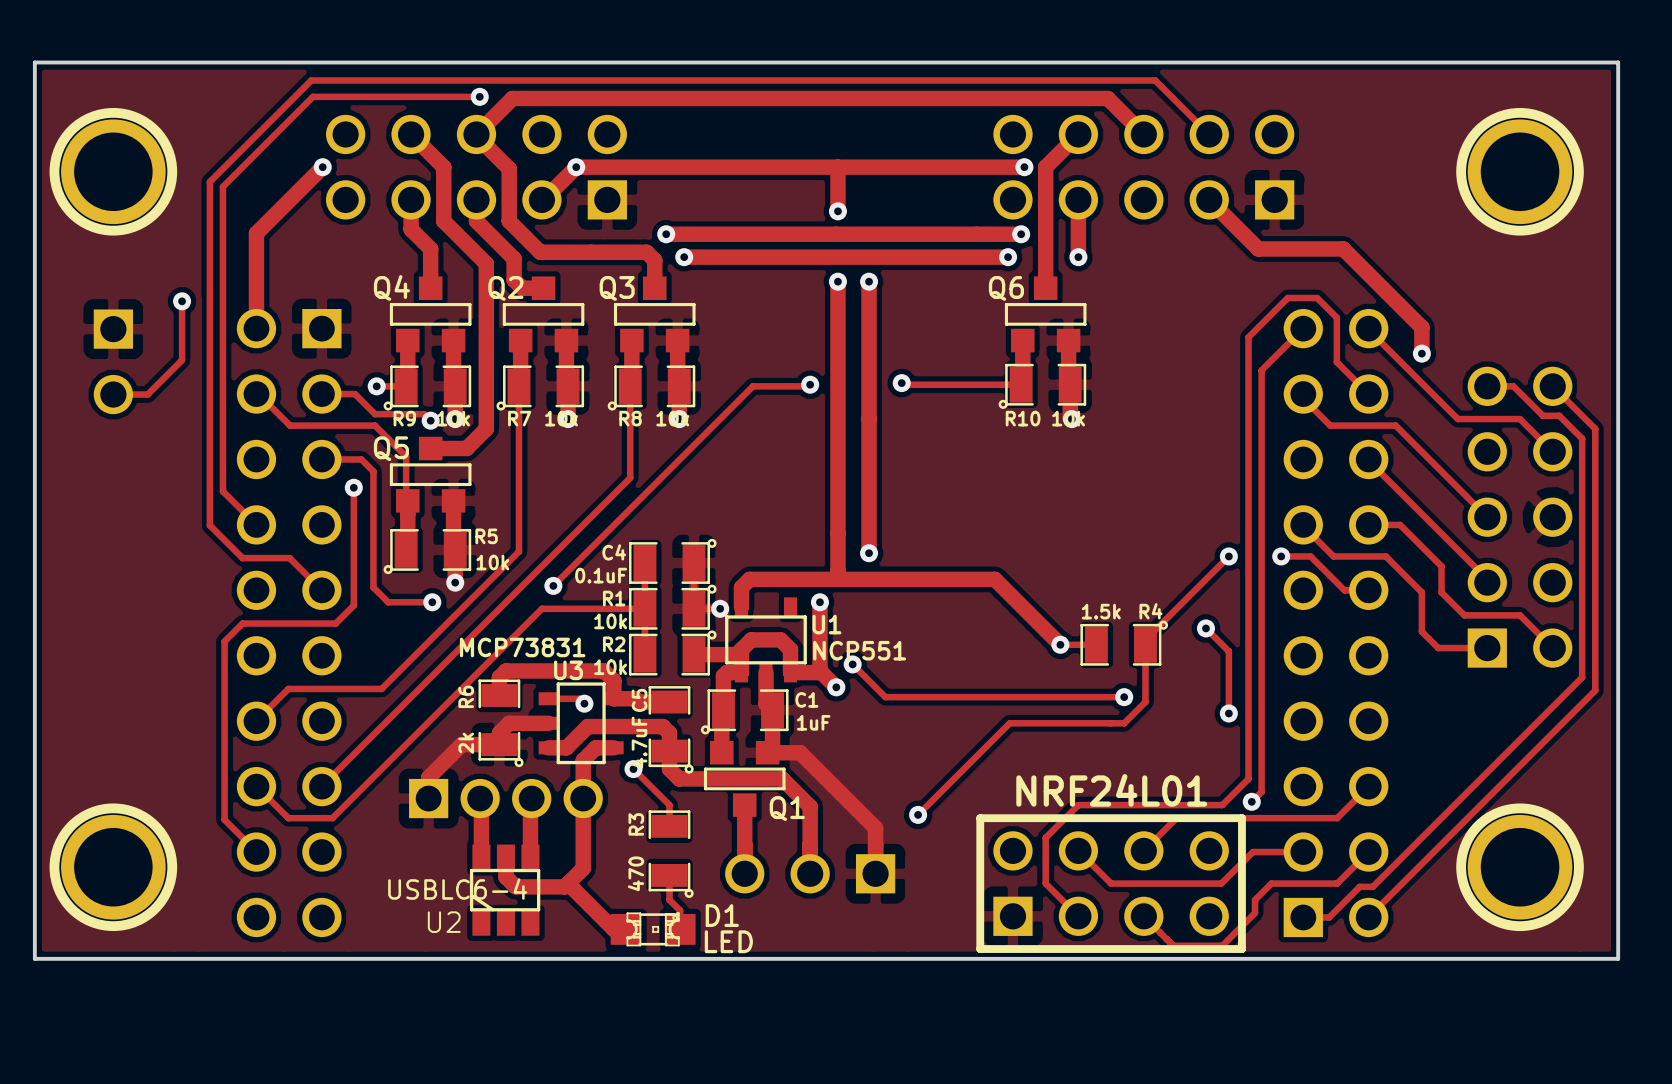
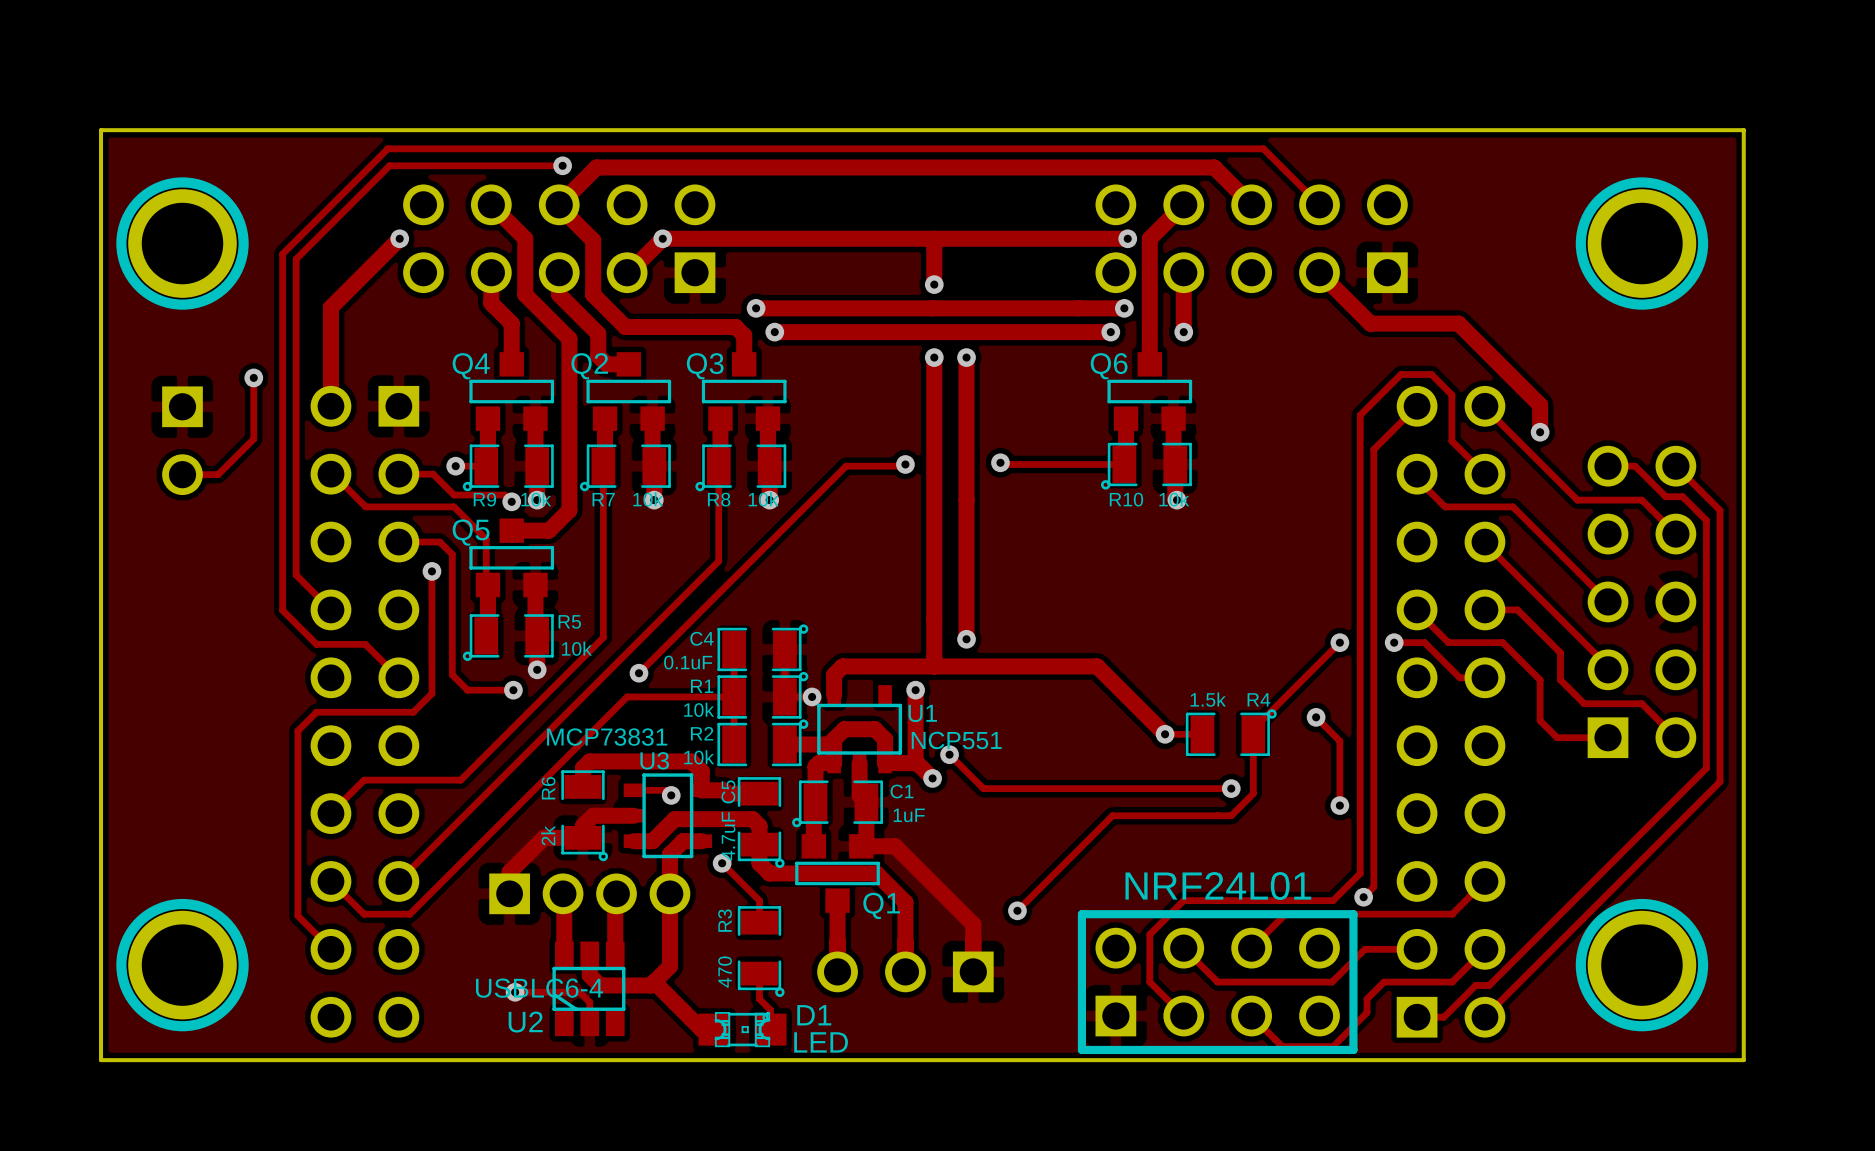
track: none -> (515, 992) (579, 992) (589, 1002) (589, 1022)
via: none -> (515, 992)

